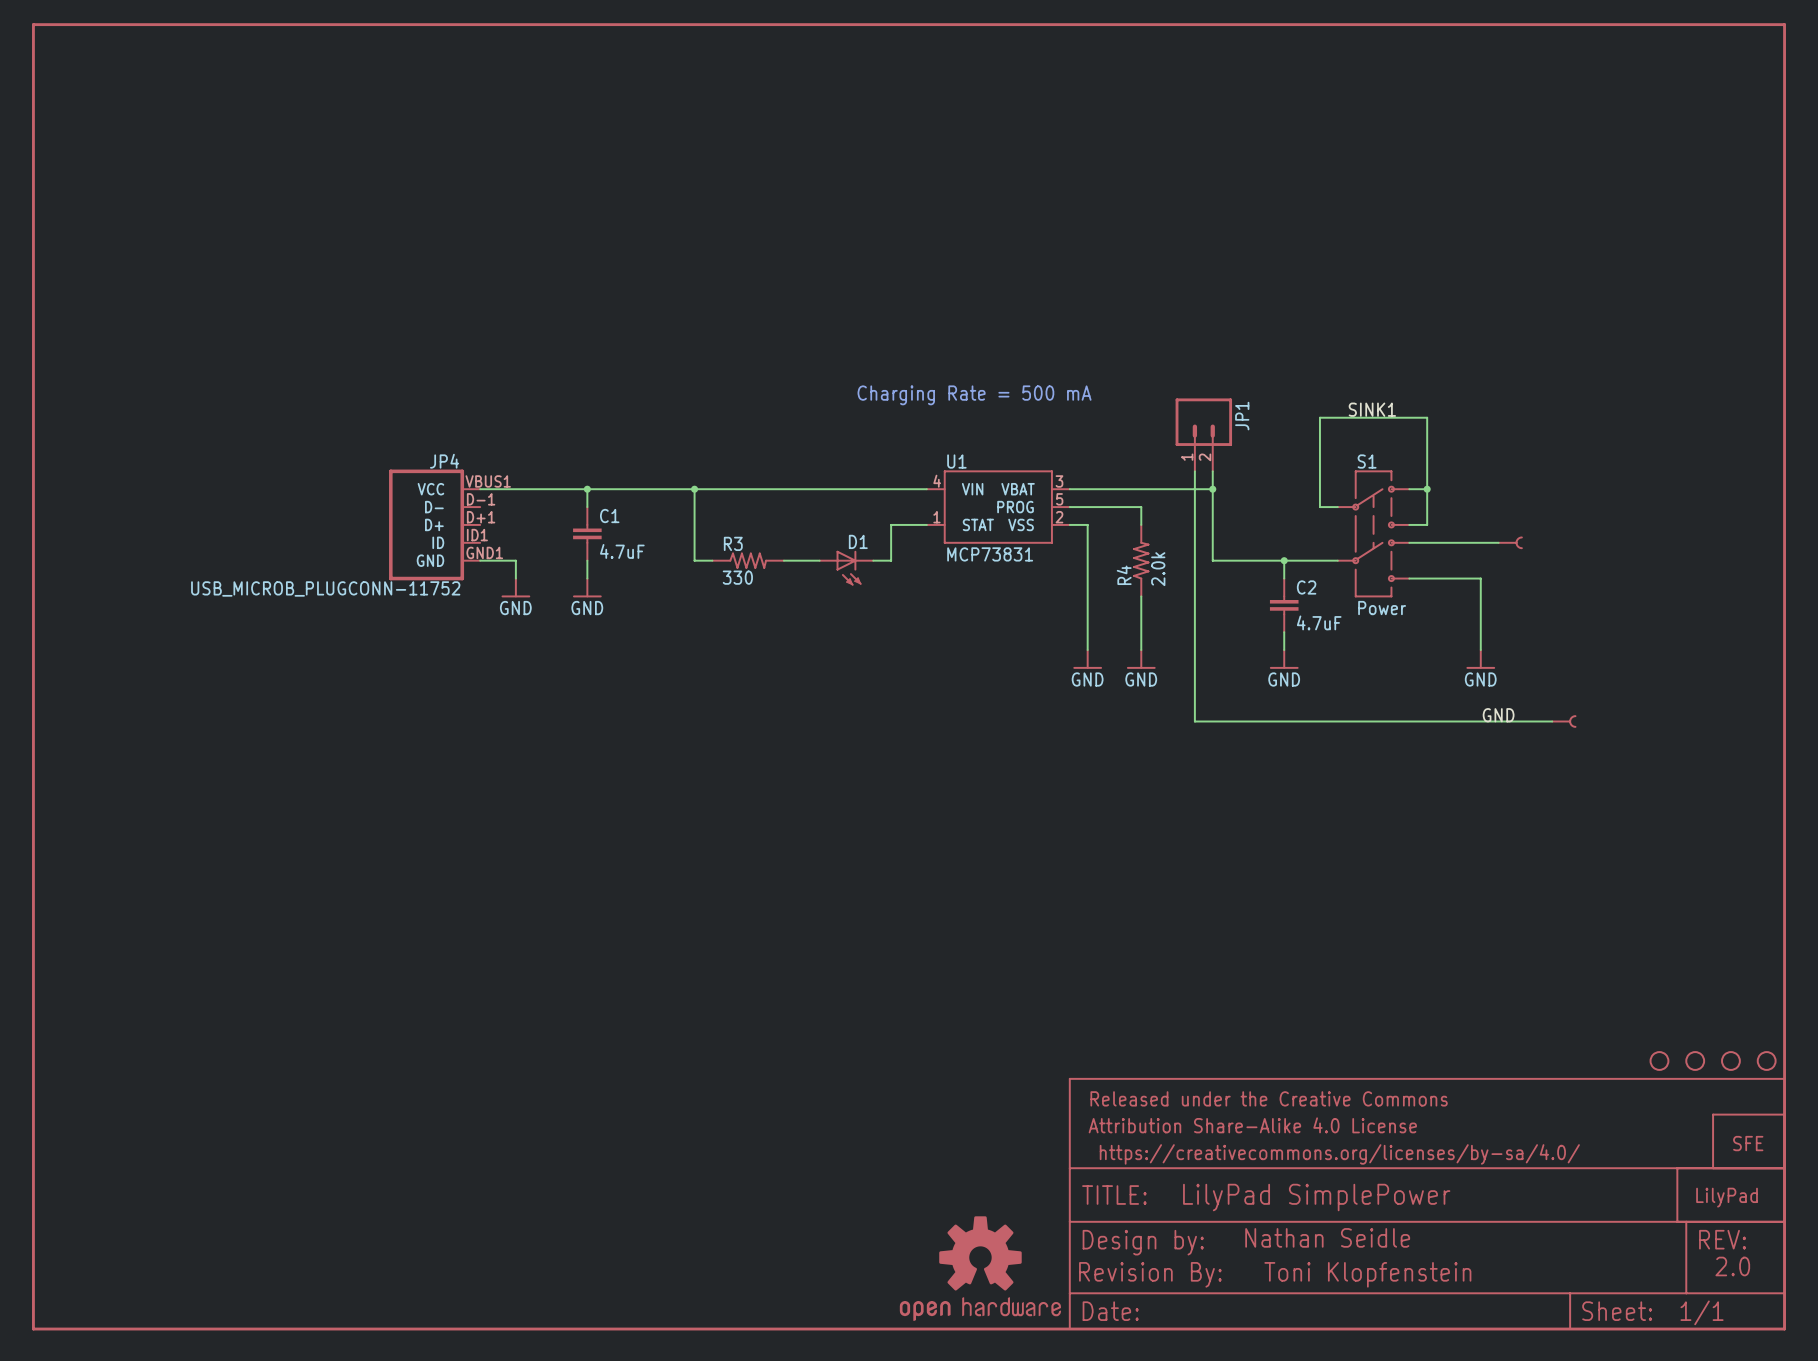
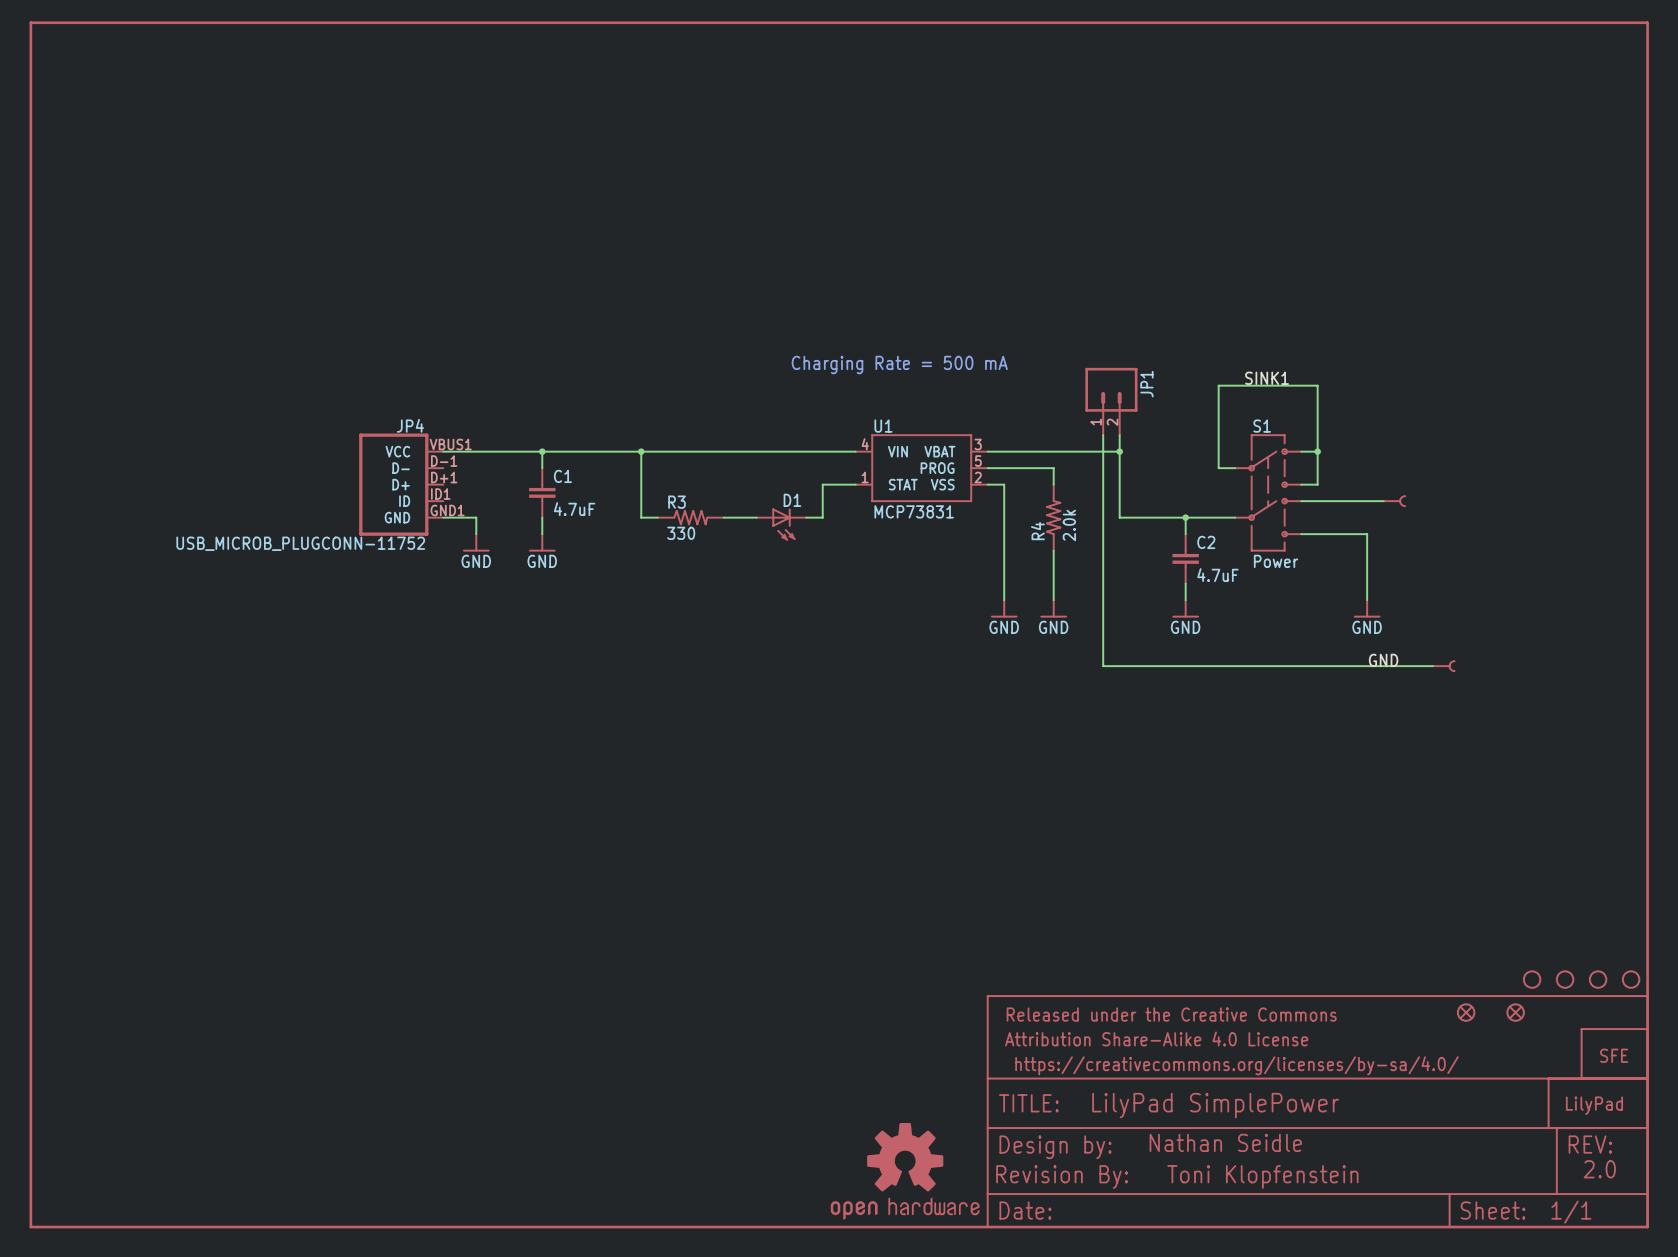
part: none -> (1466, 1012)
part: none -> (1515, 1012)

